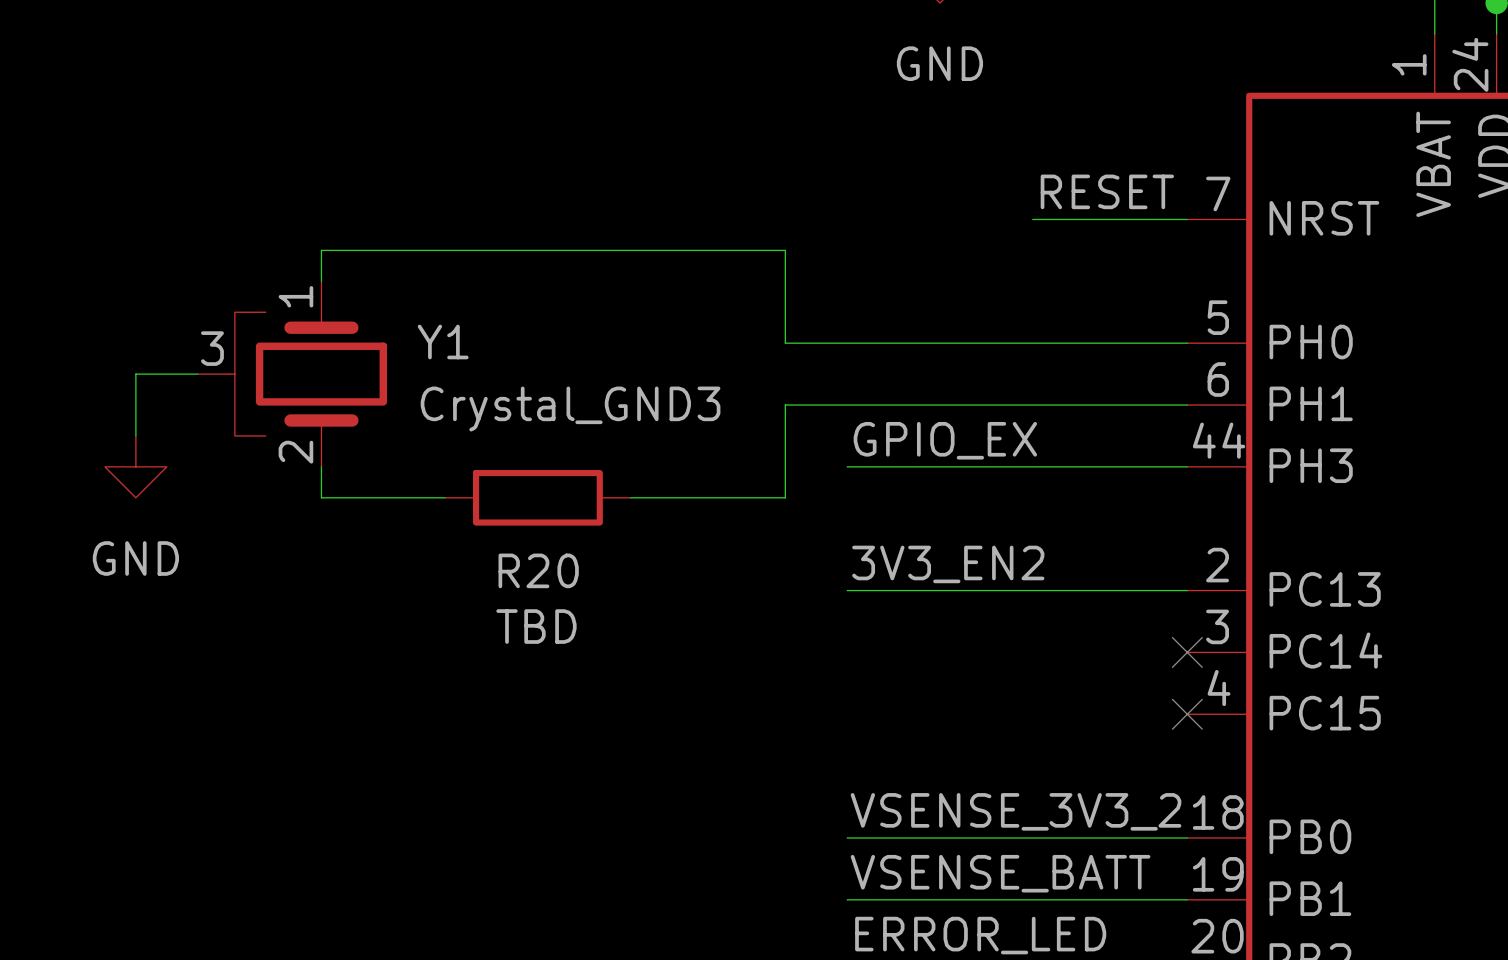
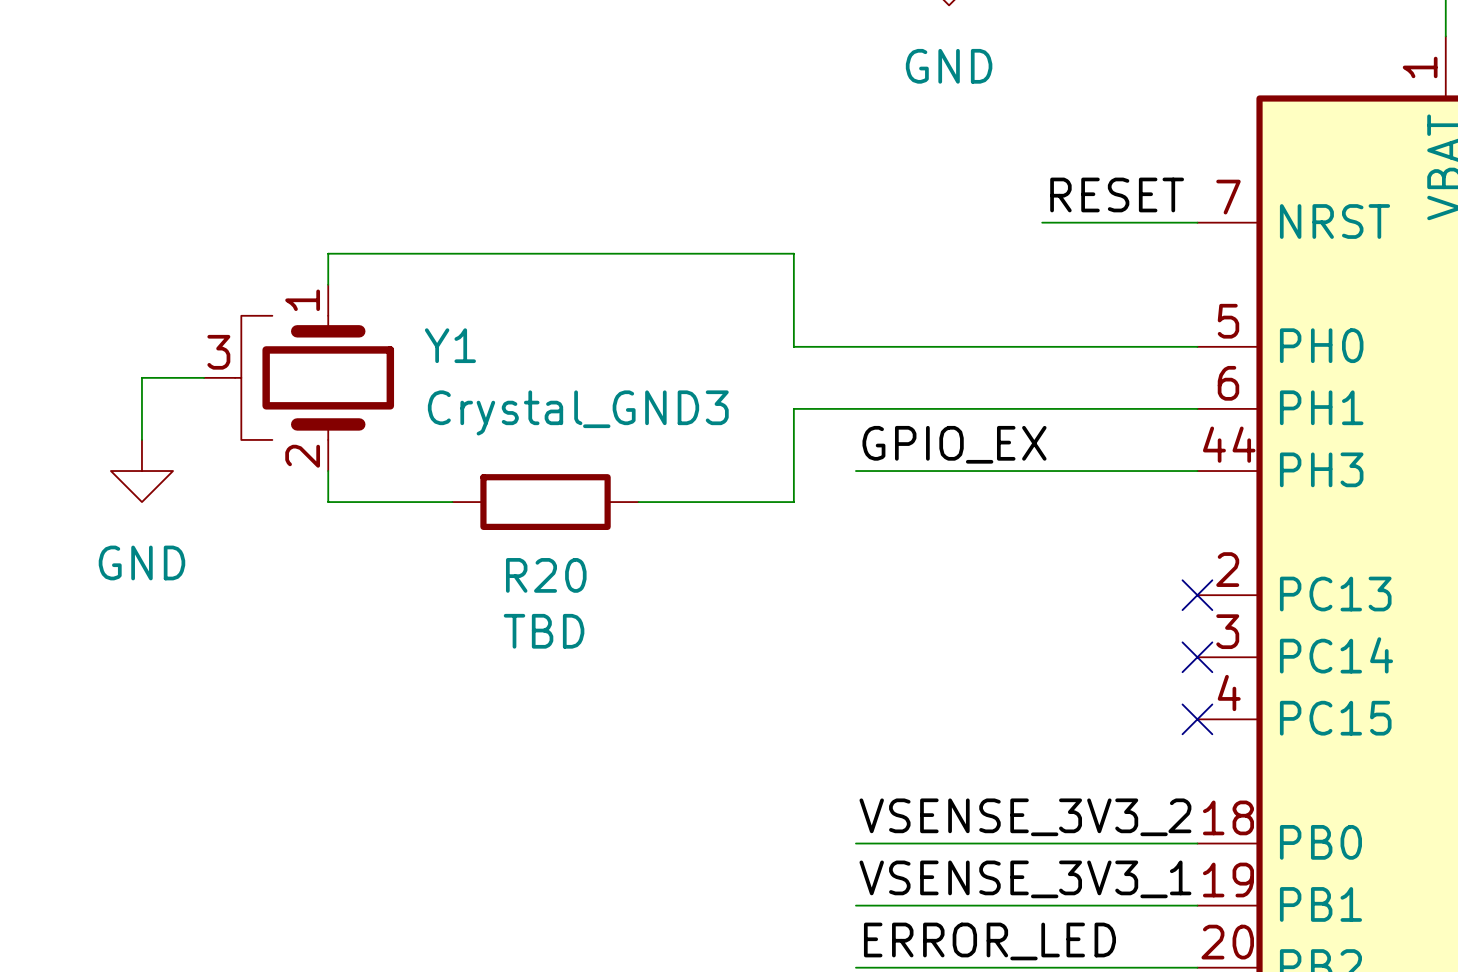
label: 3V3_EN2 (948, 564) -> none
wire: (847, 590) (1187, 590) -> none
no-connect mark: none -> (1197, 595)
label: VSENSE_BATT (1000, 873) -> VSENSE_3V3_1 (1025, 879)

